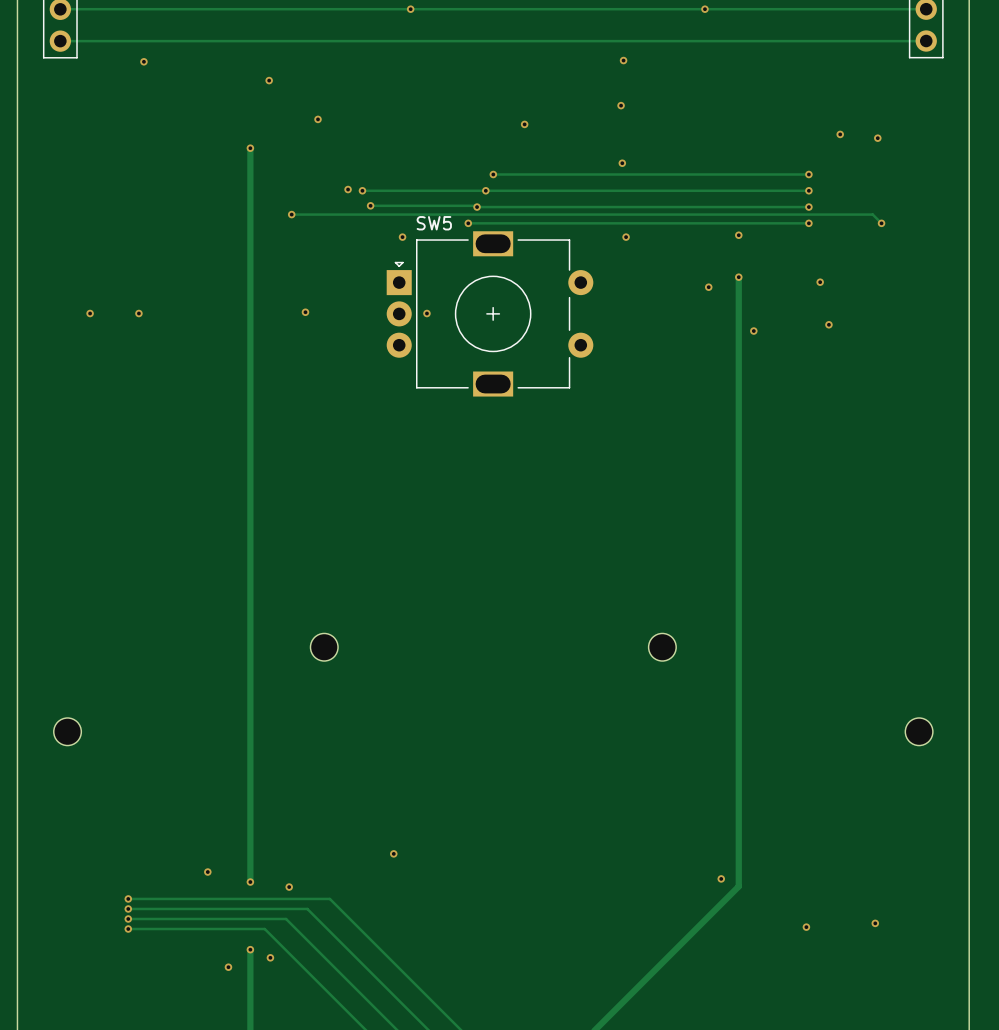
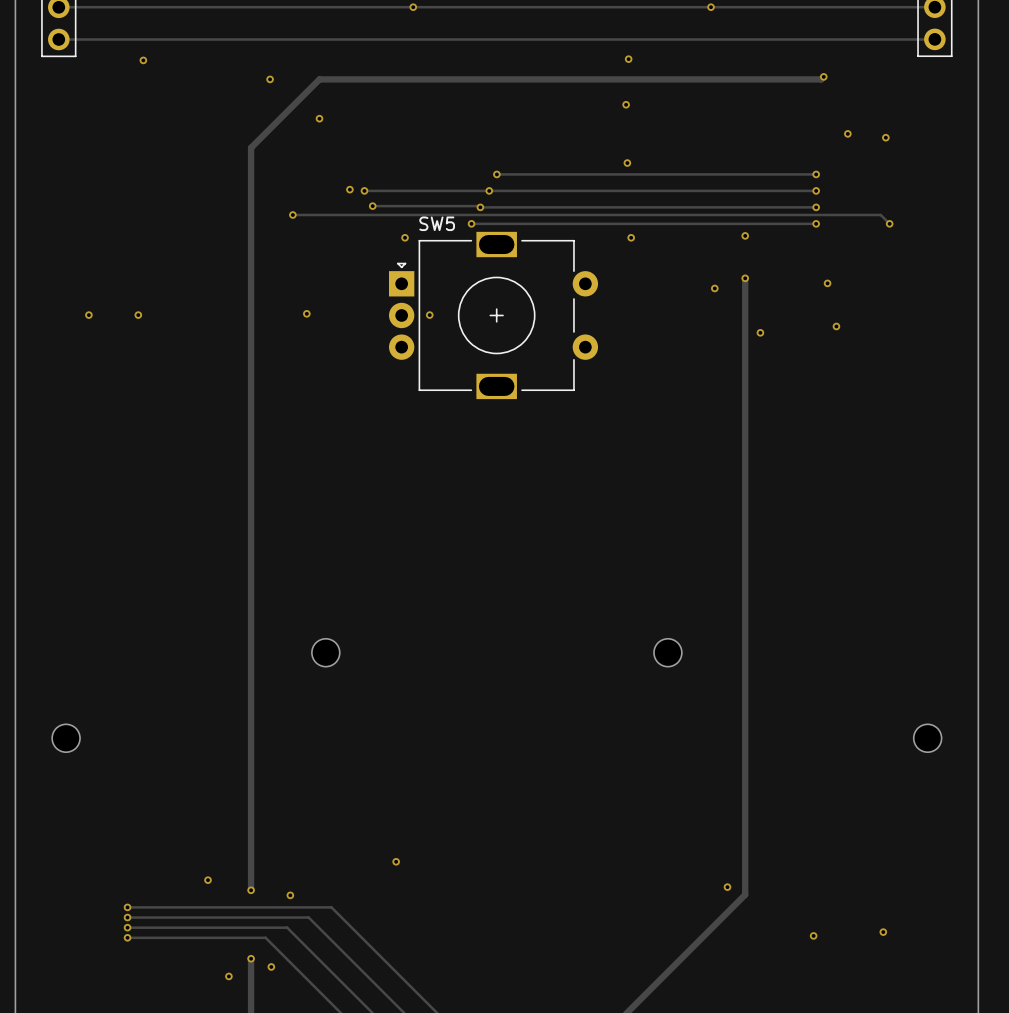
track: none -> (823, 76) (821, 79) (319, 79) (251, 147)
via: none -> (823, 76)
via: (524, 124) -> none
via: (250, 148) -> none

